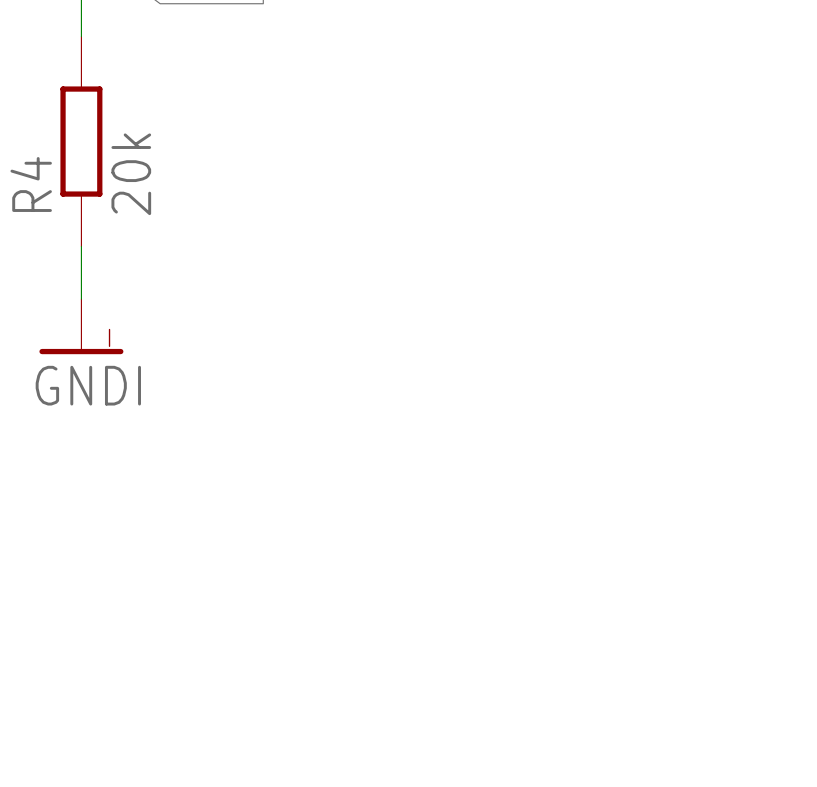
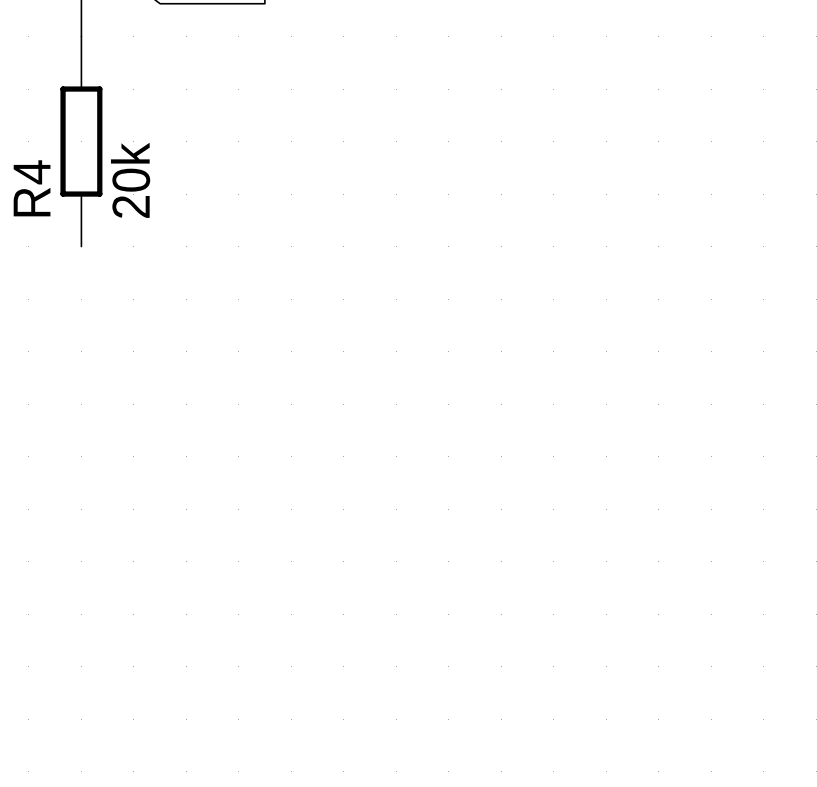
wire: (81, 246) (81, 299) -> none
power symbol: GNDI (81, 326) -> none

